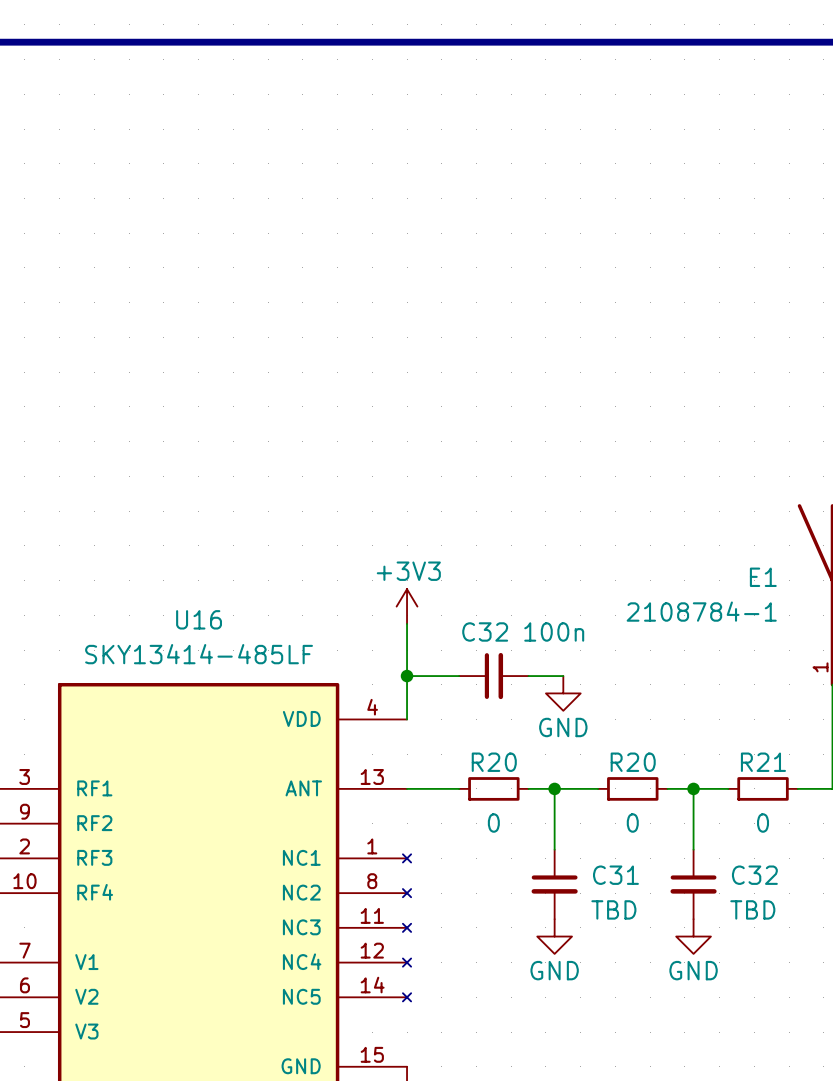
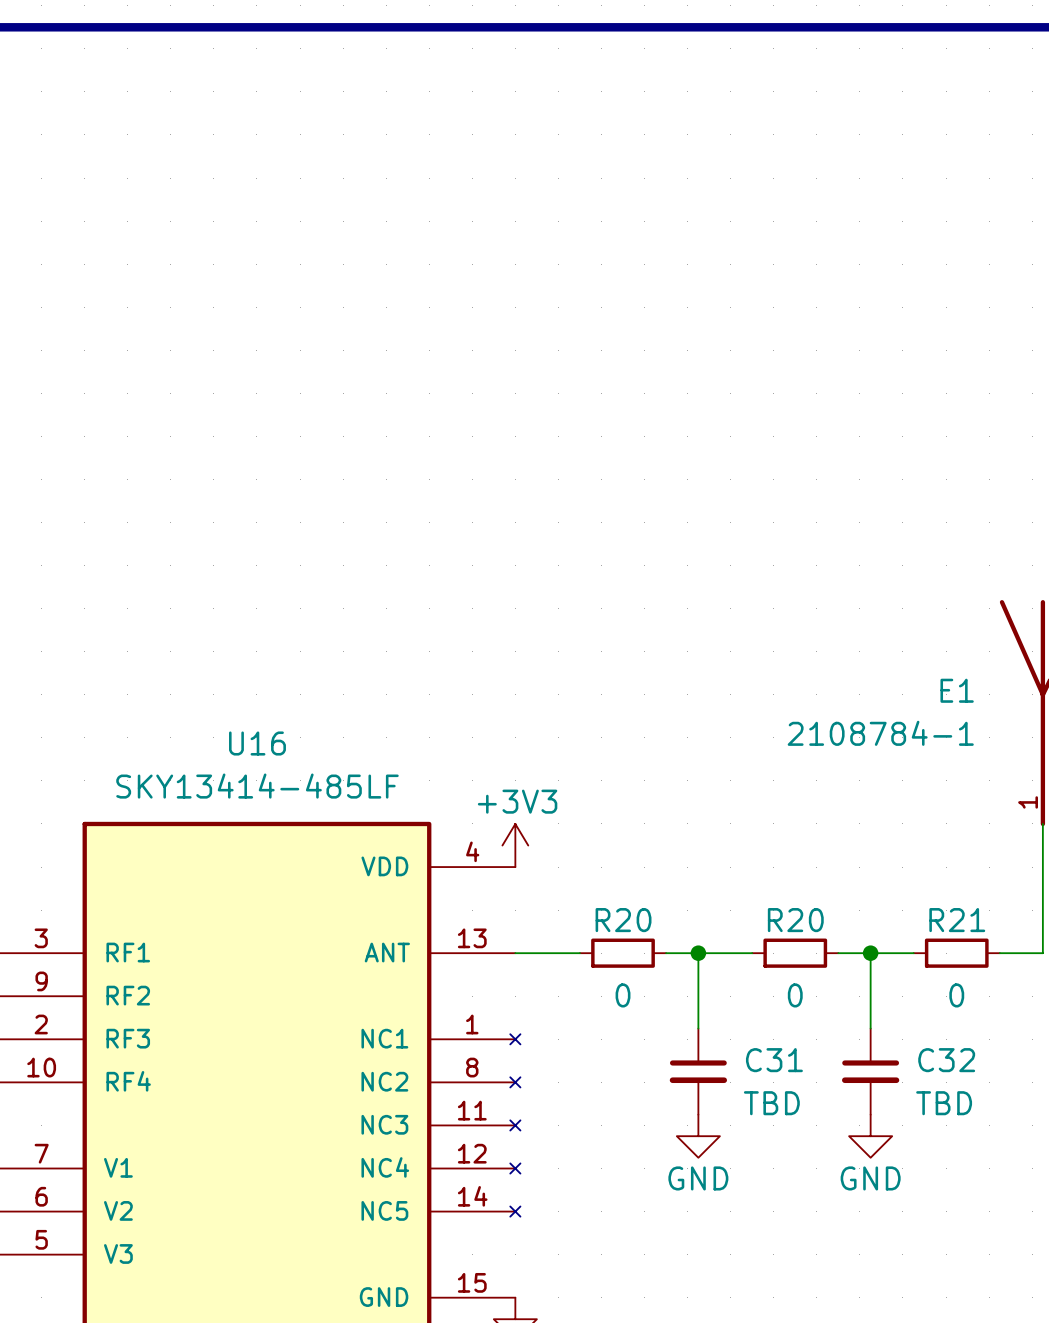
power symbol position: +3V3 (407, 606) -> +3V3 (515, 845)
wire: (407, 623) (407, 719) -> none
wire: (407, 676) (459, 676) -> none
junction: (407, 676) -> none
C32: 100n (493, 676) -> none
wire: (528, 676) (563, 676) -> none
power symbol: GND (563, 693) -> none

